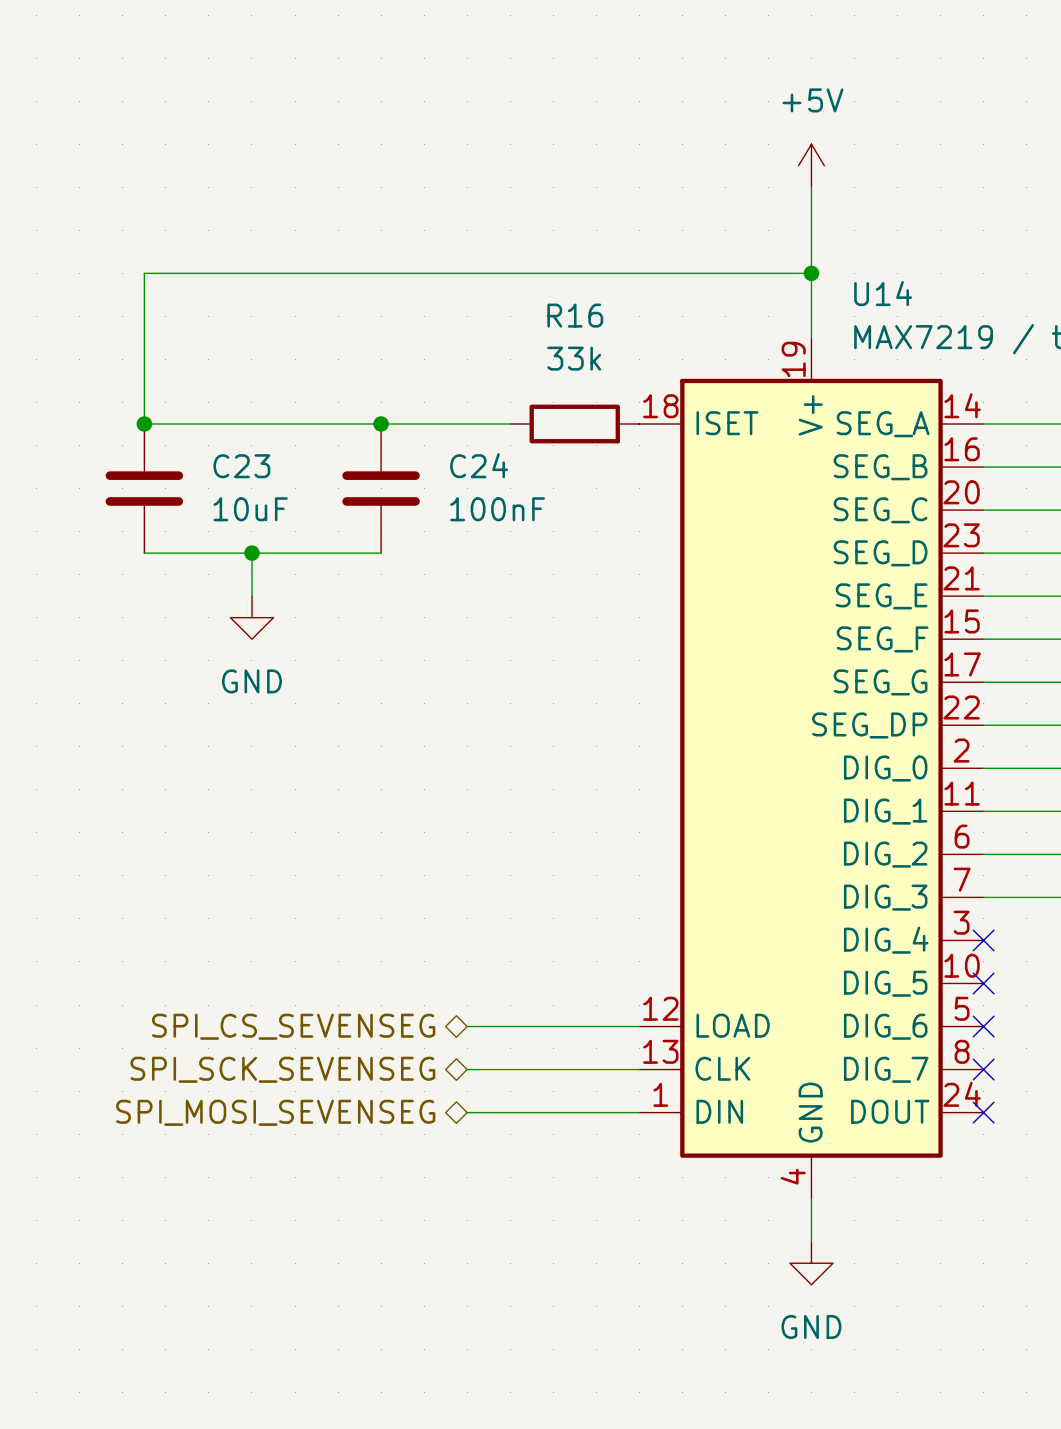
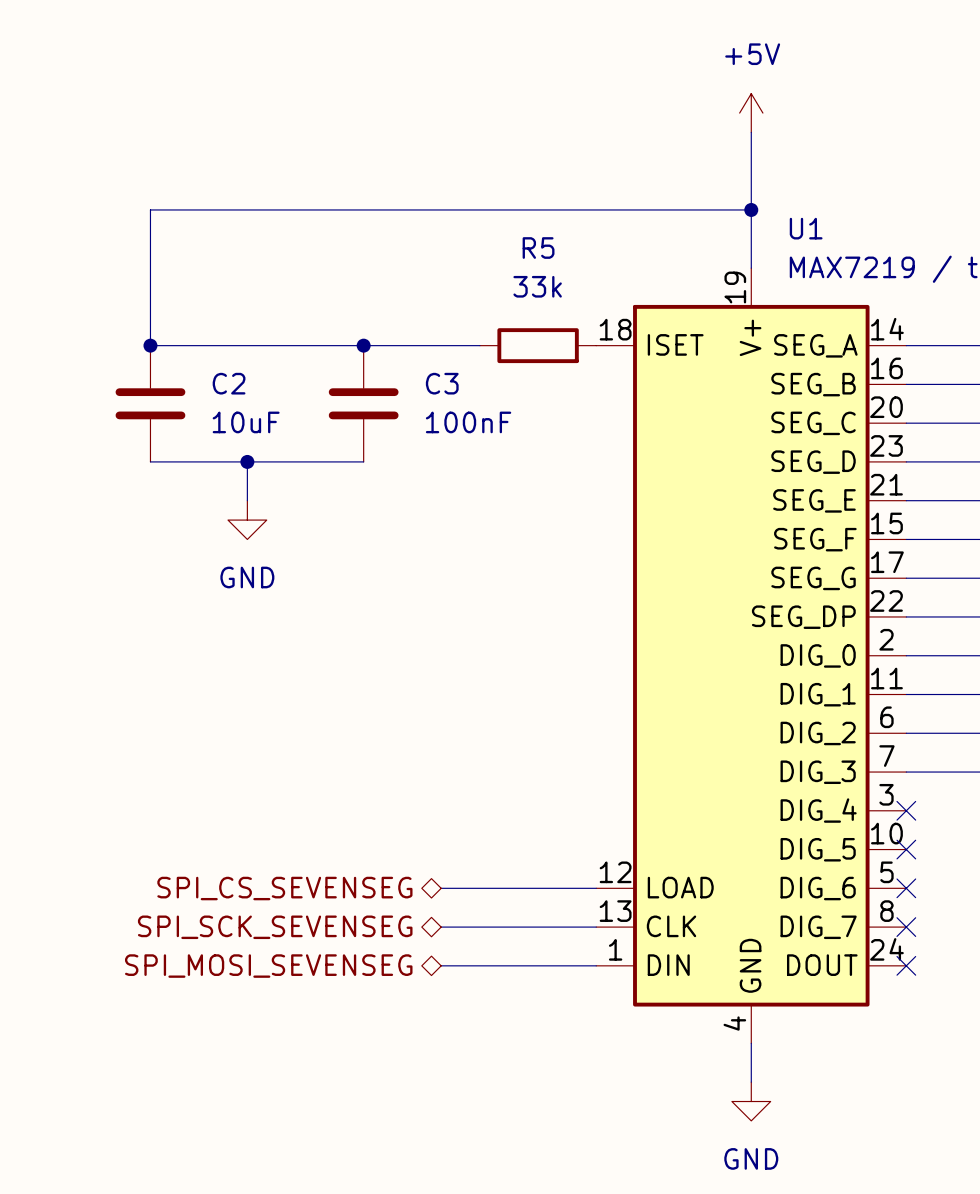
U14 name: U14 (883, 293) -> U1 (806, 228)
R16 name: R16 (575, 315) -> R5 (538, 248)
C24 name: C24 (479, 465) -> C3 (442, 383)
C23 name: C23 (241, 466) -> C2 (229, 383)

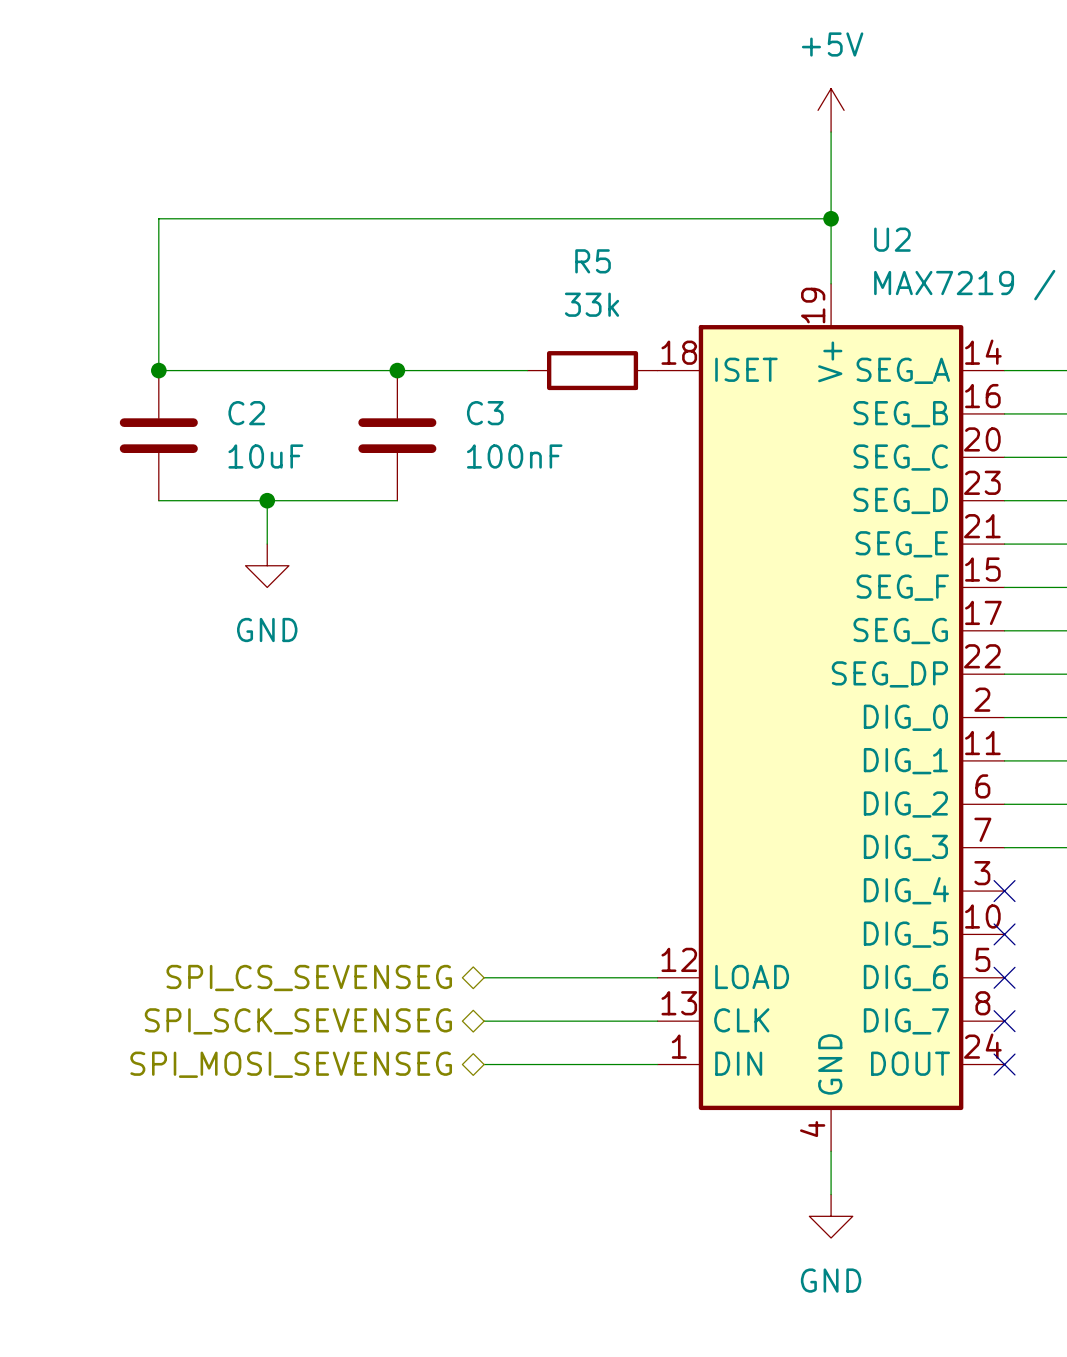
U1 name: U1 (806, 228) -> U2 (892, 239)

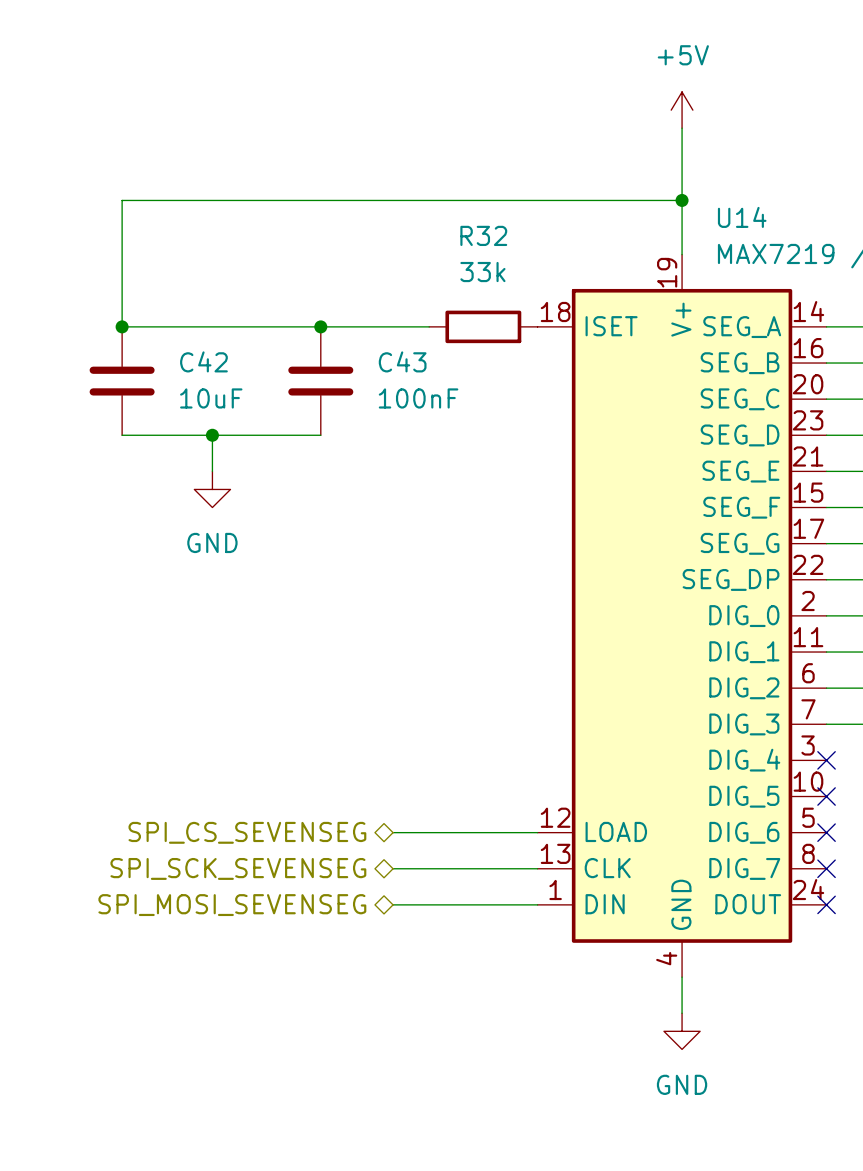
U2 name: U2 (892, 239) -> U14 (742, 217)
R5 name: R5 (593, 261) -> R32 (483, 235)
C2 name: C2 (246, 413) -> C42 (203, 361)
C3 name: C3 (485, 413) -> C43 (402, 361)

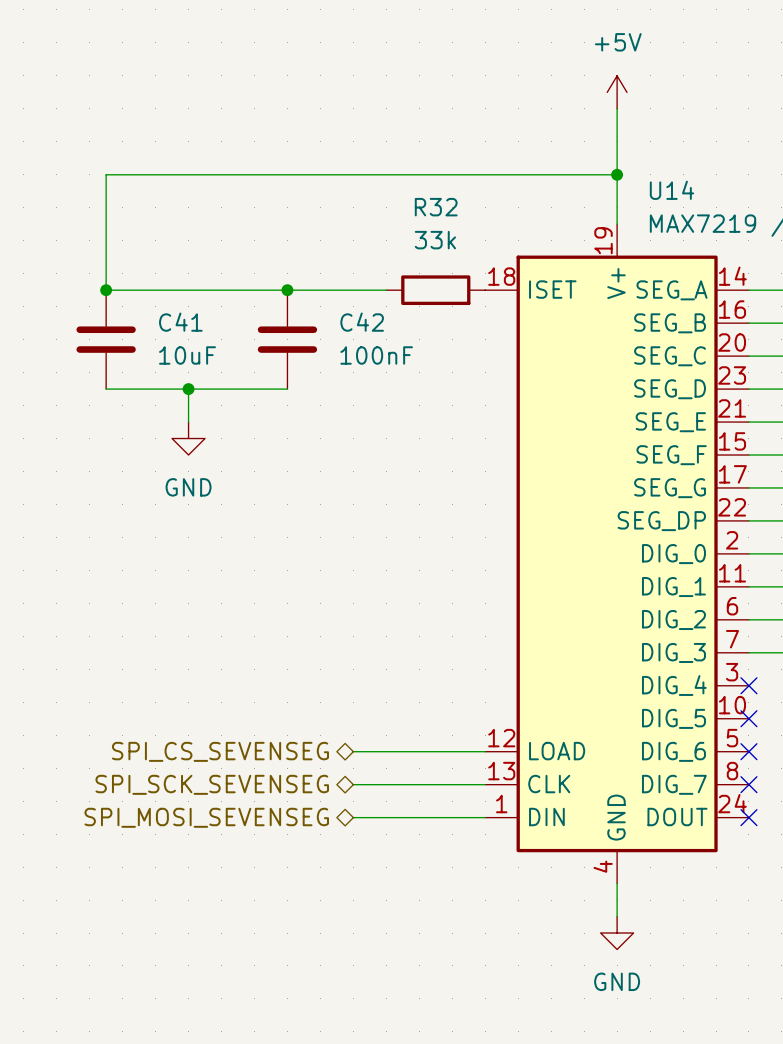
C42 name: C42 (203, 361) -> C41 (180, 322)
C43 name: C43 (402, 361) -> C42 (362, 322)

